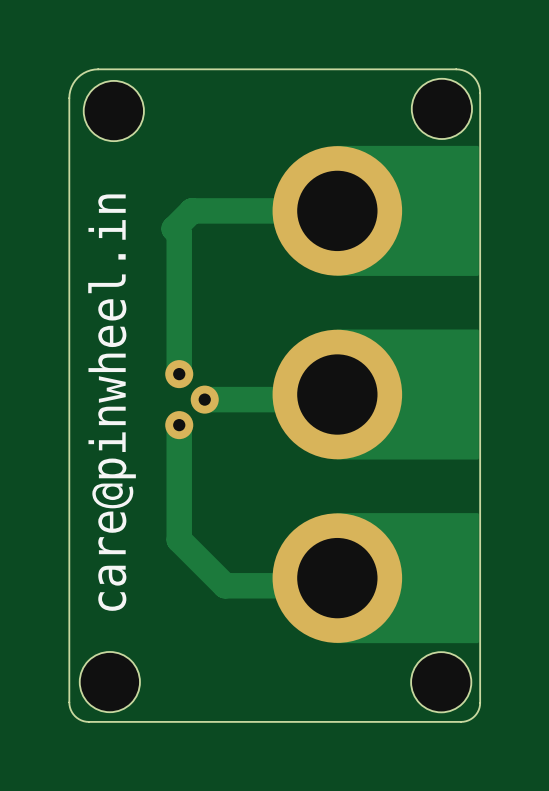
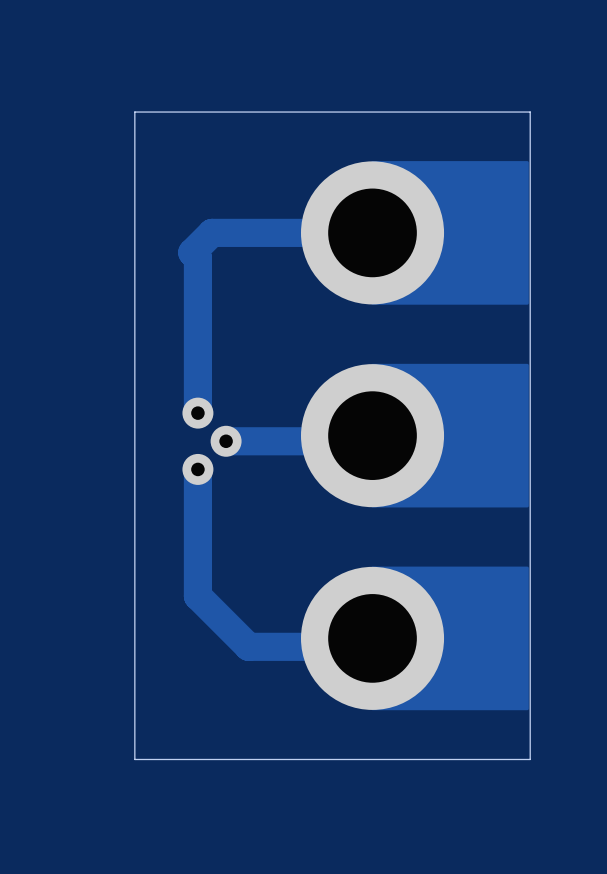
board edge: (480, 101) (479, 87) (475, 78) (465, 71) (456, 69) (98, 69) (87, 71) (75, 80) (69, 98) (69, 702) (75, 716) (88, 721) (461, 721) (470, 719) (477, 712) (479, 705) (480, 687) -> (530, 112) (134, 112) (134, 759) (530, 759)
hole: (441, 108) -> none
hole: (113, 111) -> none
text: care@pinwheel.in (112, 402) -> none
hole: (109, 682) -> none
hole: (441, 682) -> none

